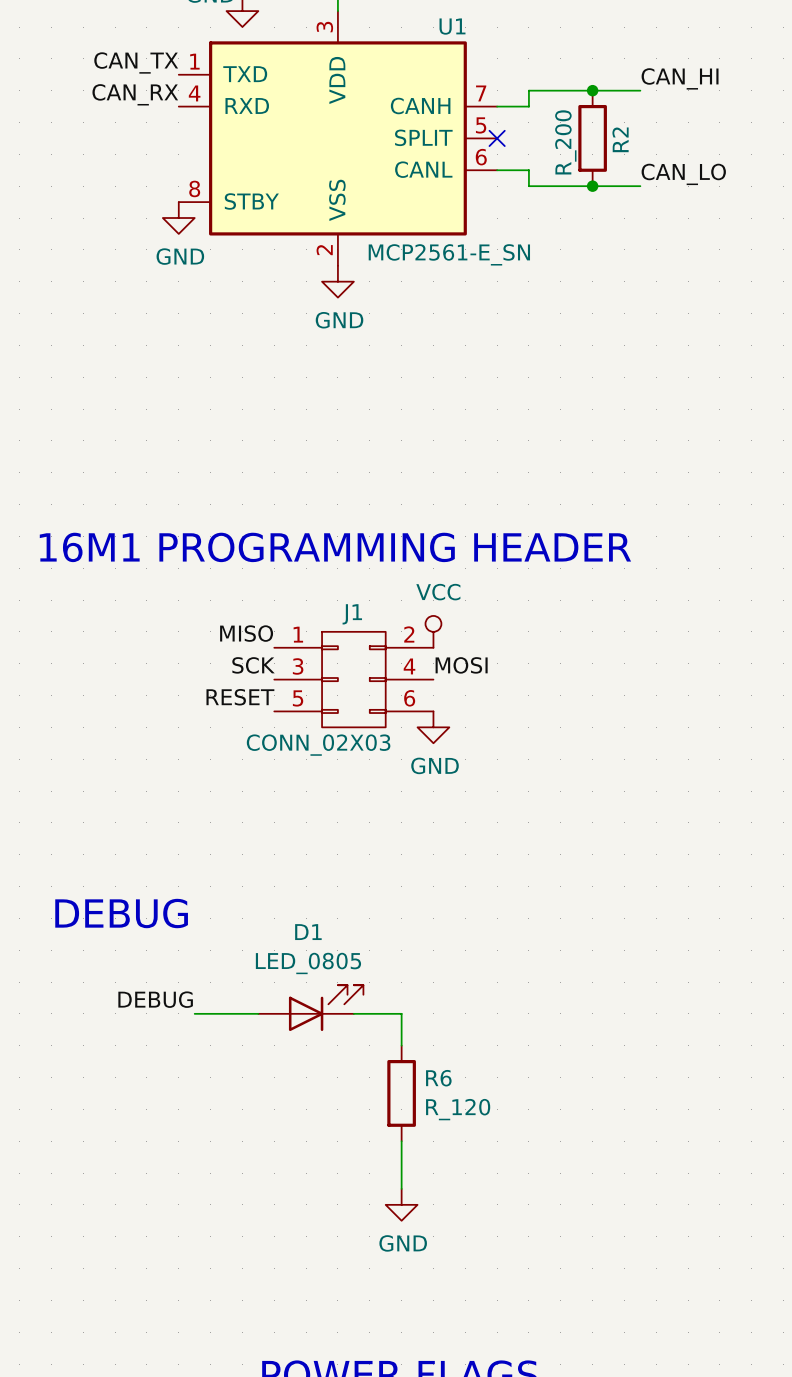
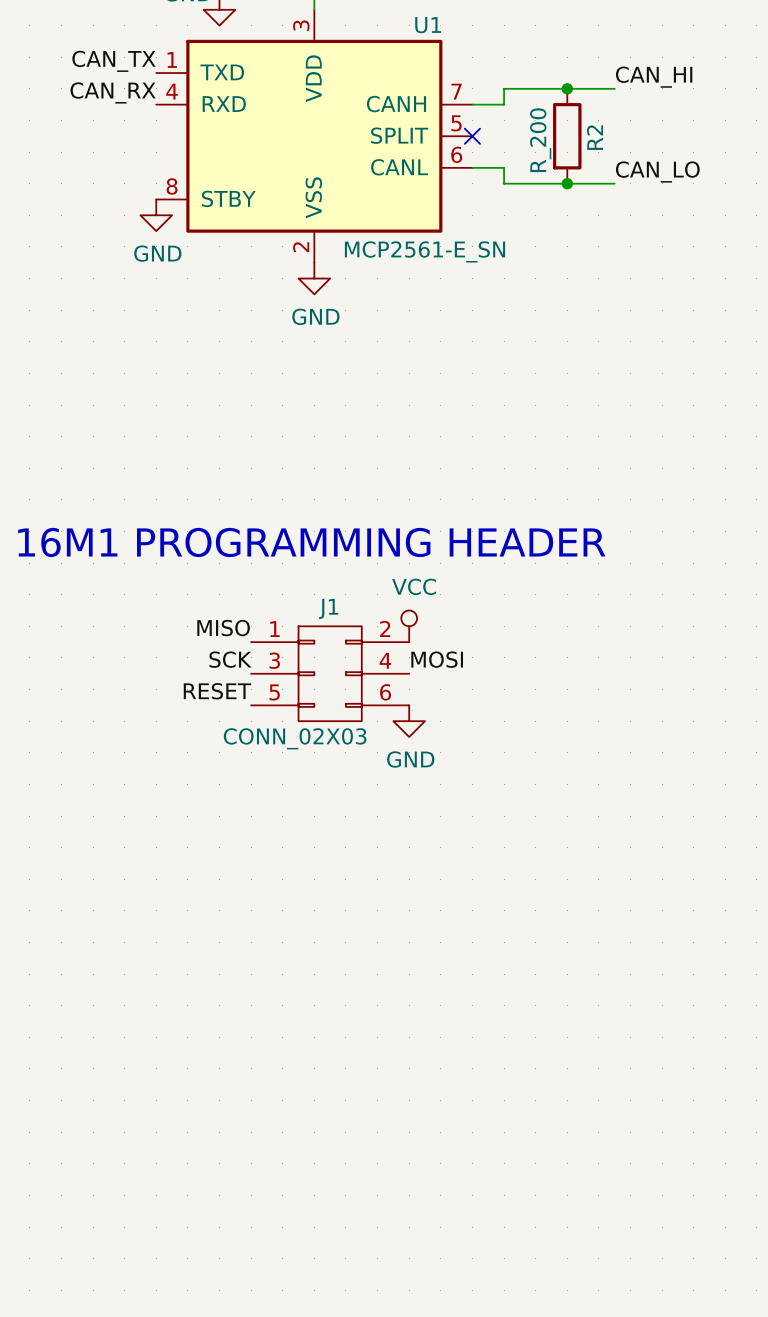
text: DEBUG (121, 913) -> none
label: DEBUG (155, 999) -> none
D1: LED_0805 (310, 1008) -> none
wire: (194, 1013) (258, 1013) -> none
wire: (353, 1013) (401, 1013) (401, 1045) -> none
R6: R_120 (401, 1093) -> none
wire: (401, 1141) (401, 1188) -> none
power symbol: GND (401, 1204) -> none

